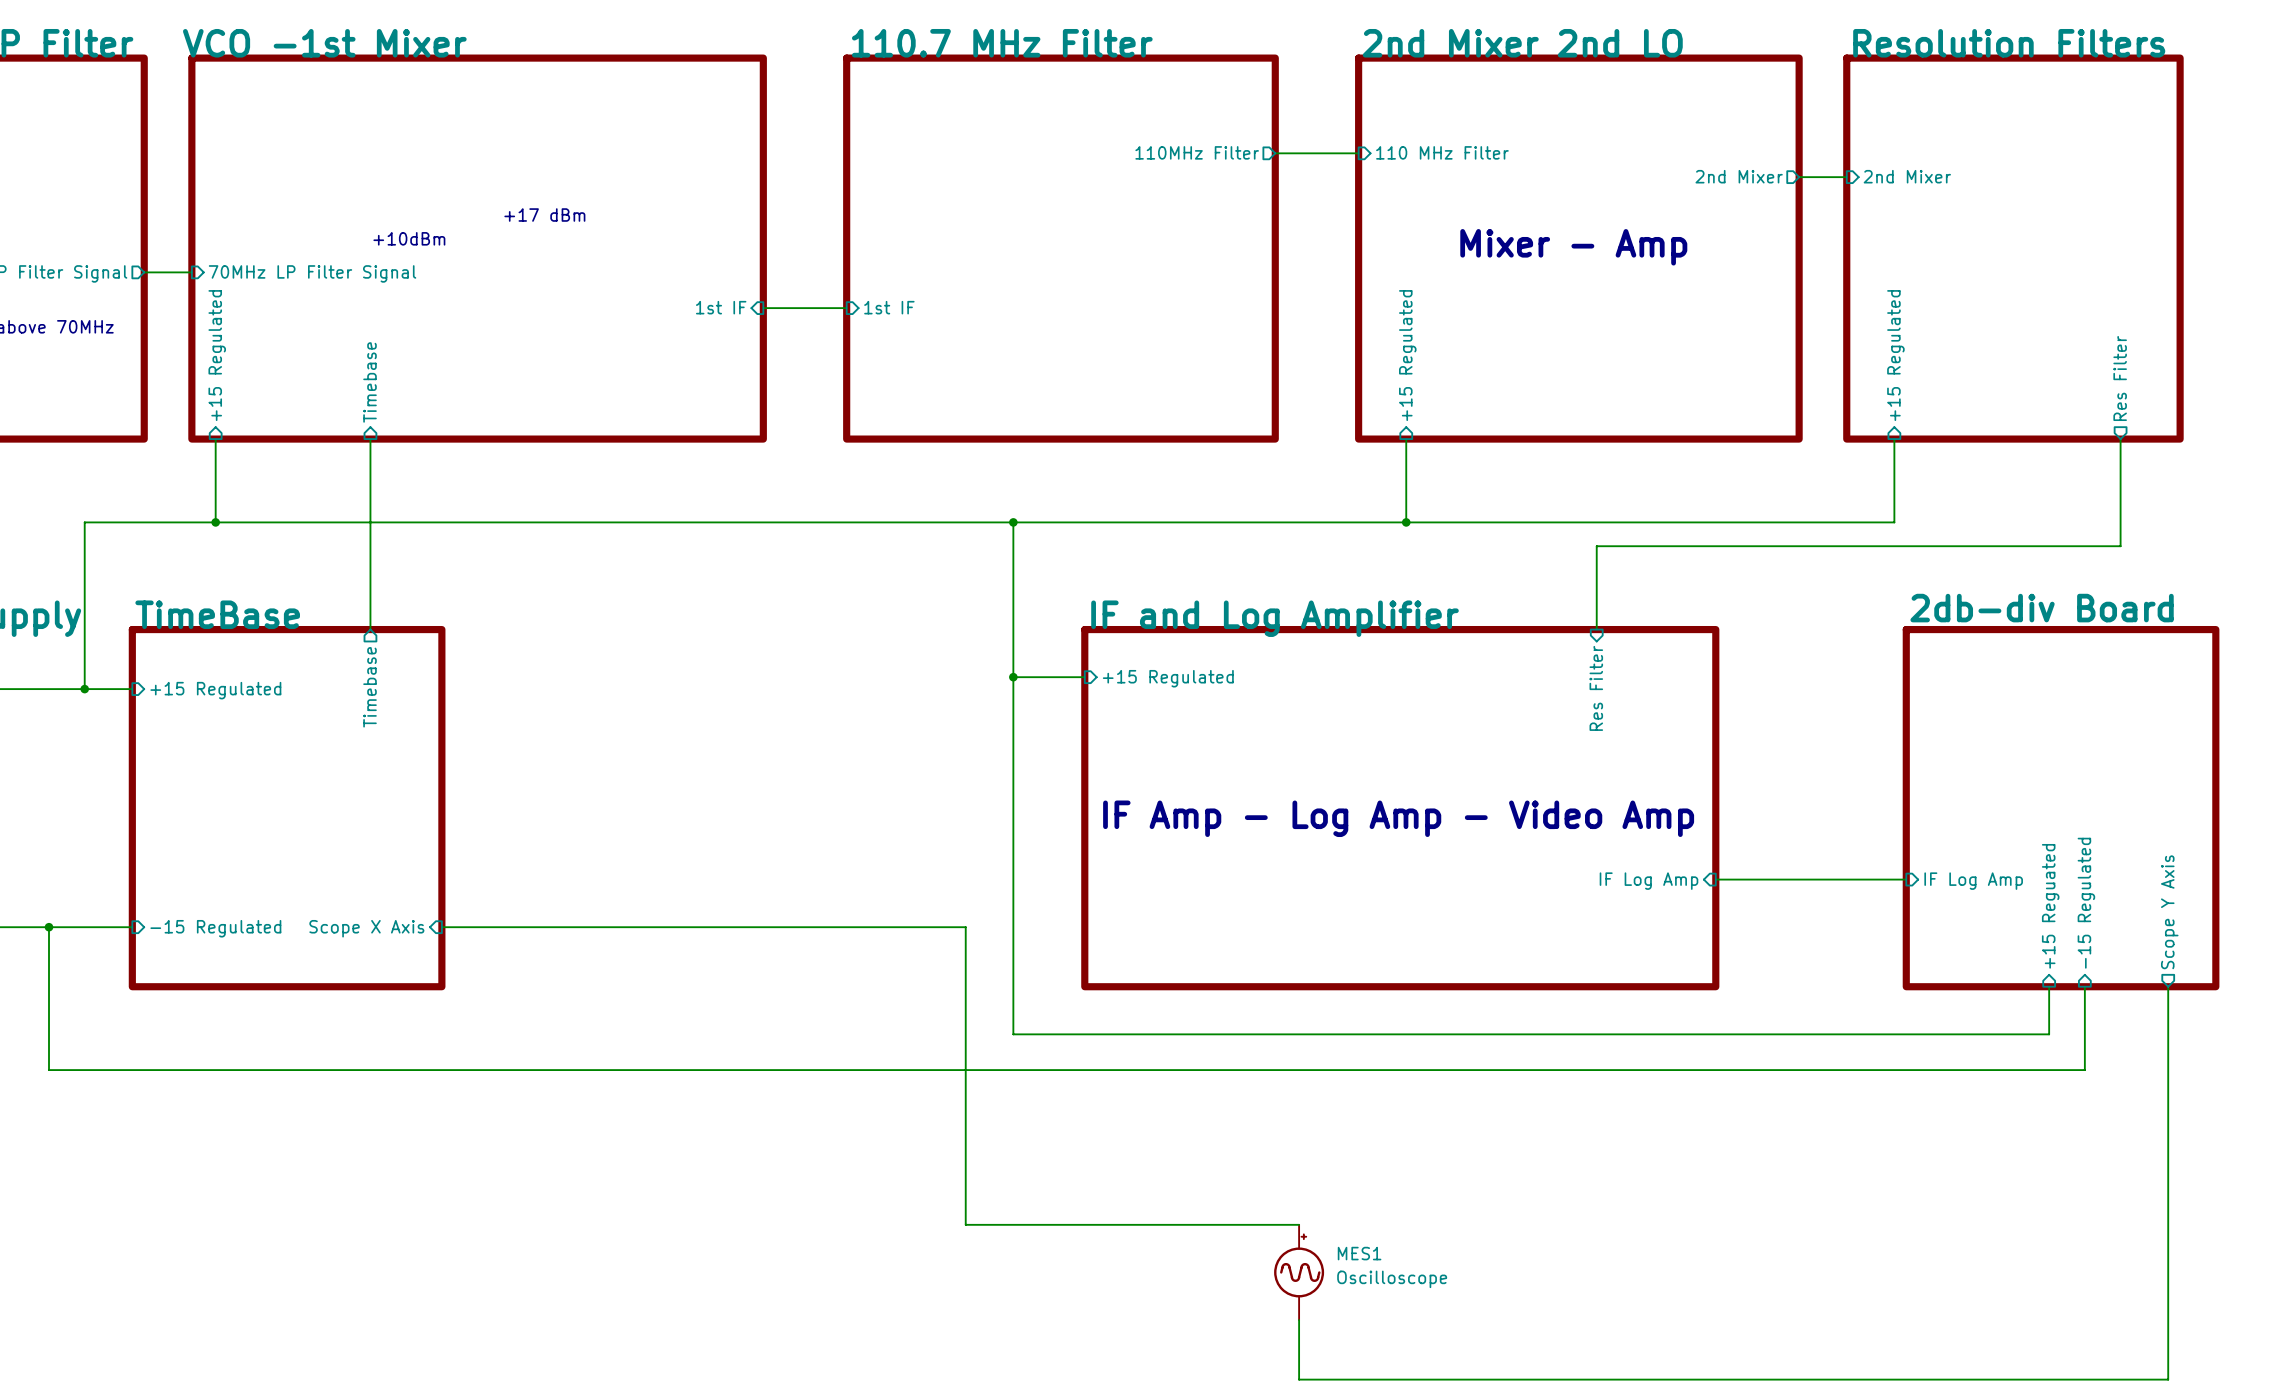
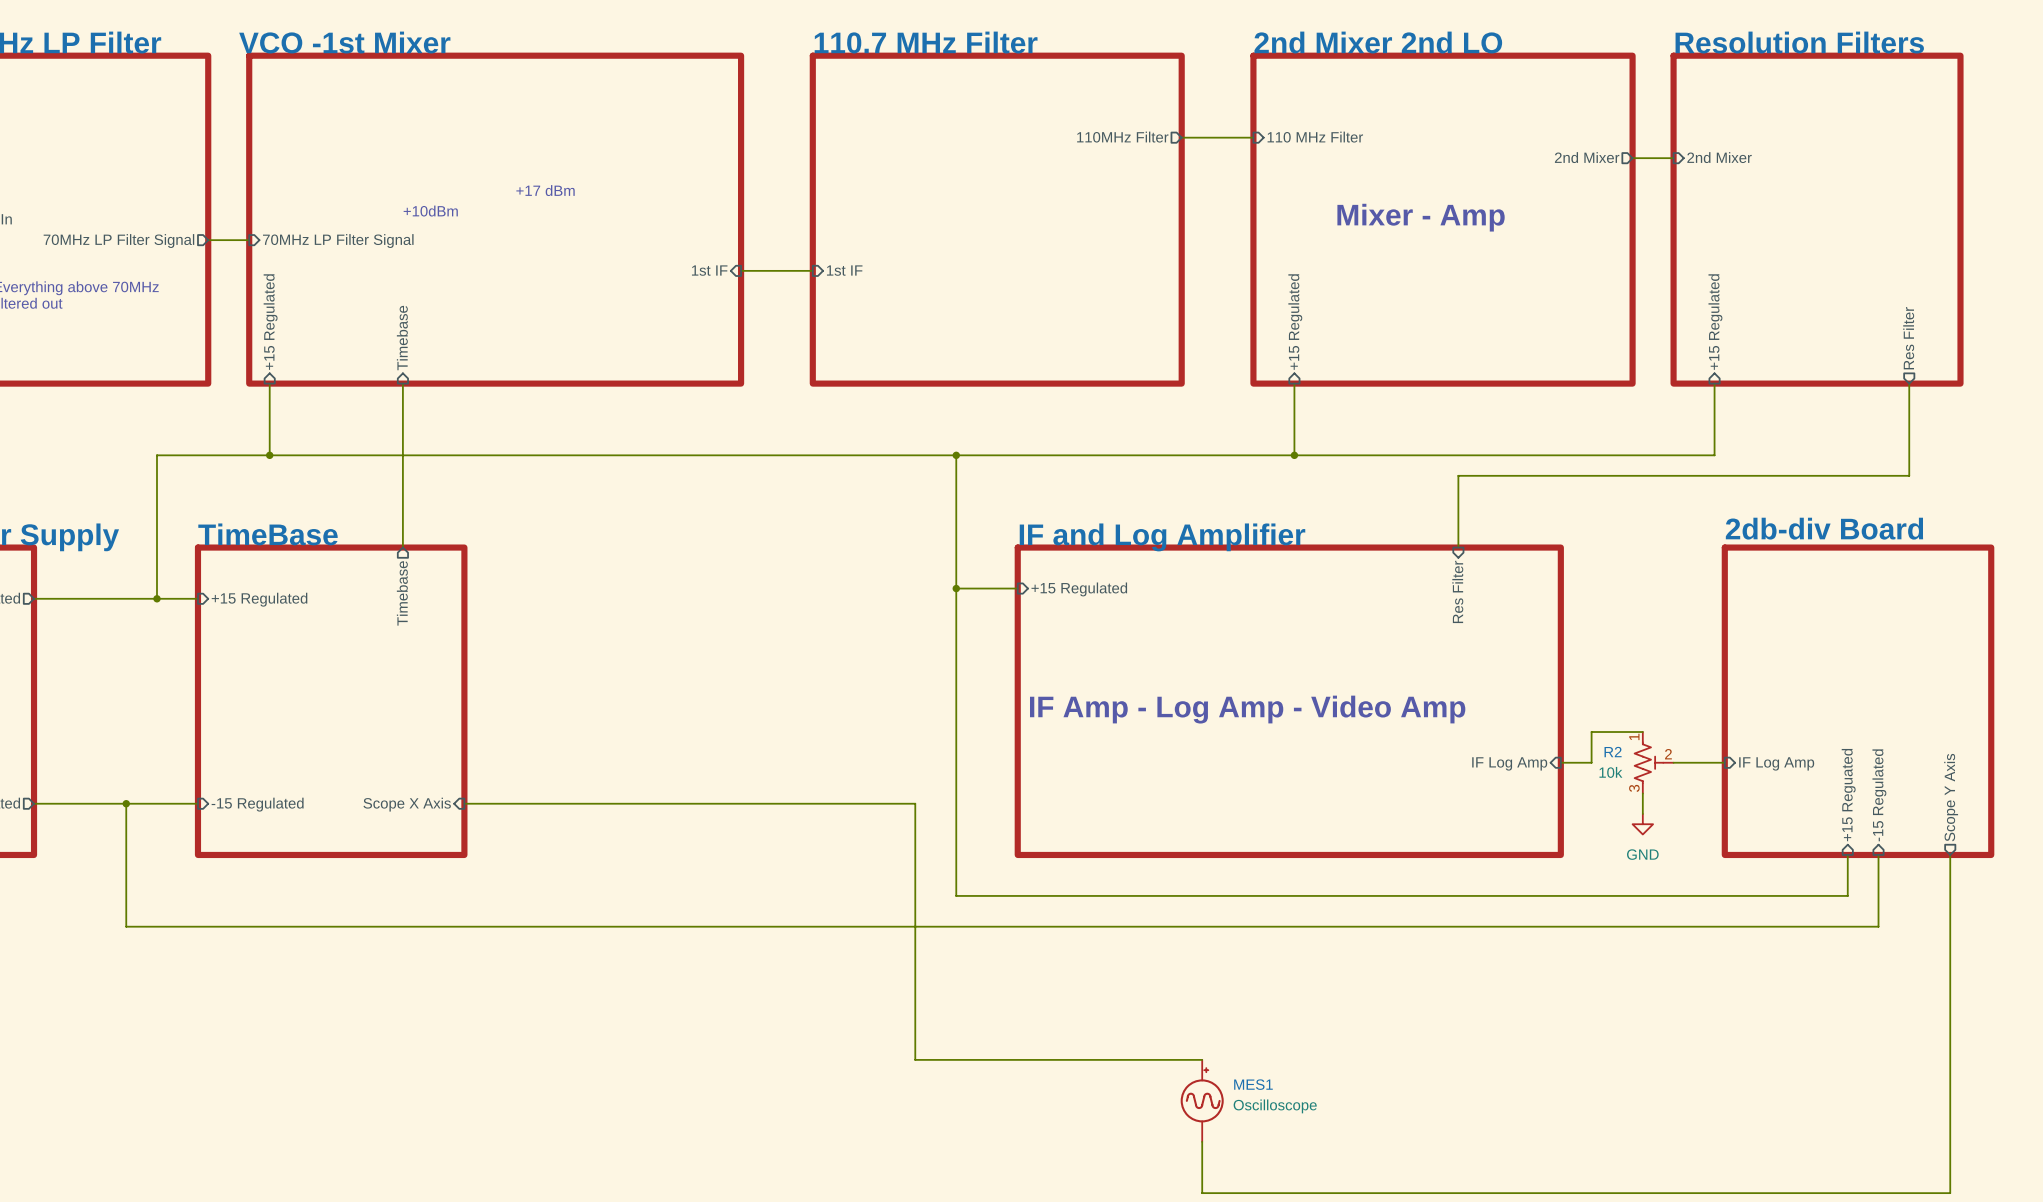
wire: (1751, 879) (1846, 879) -> (1591, 762) (1591, 732) (1642, 732)
R2: none -> 10k (1654, 762)
wire: none -> (1642, 793) (1642, 813)
power symbol: none -> GND (1642, 824)

